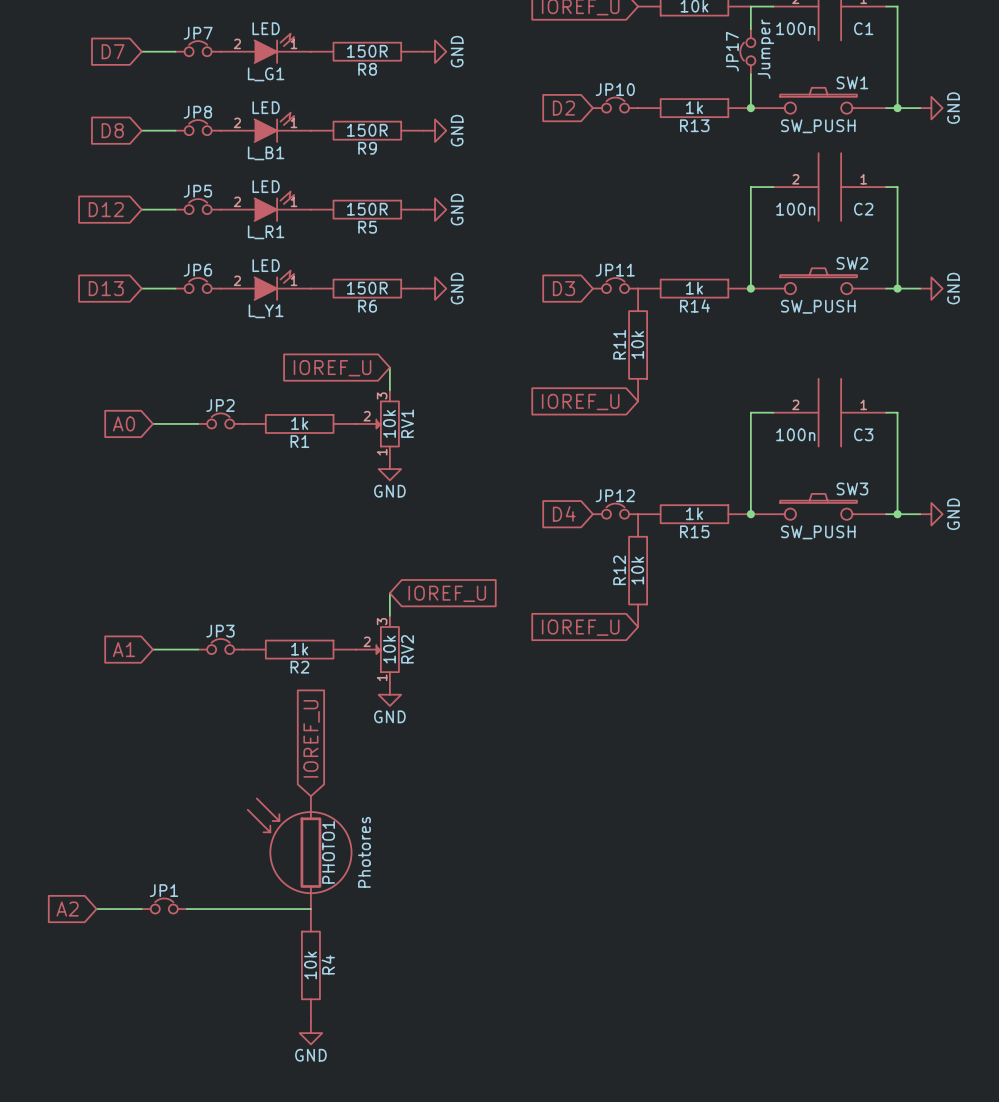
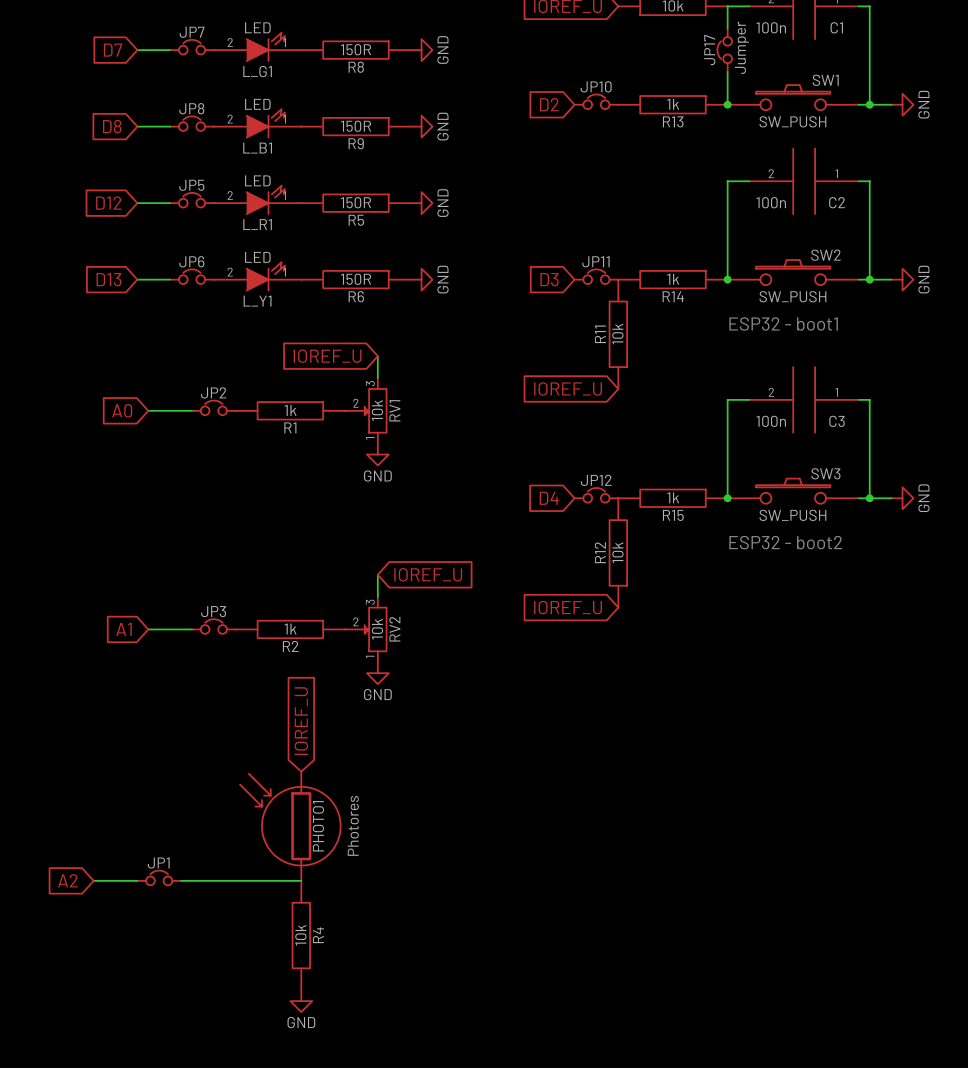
text: none -> ESP32 - boot1 (783, 323)
text: none -> ESP32 - boot2 (785, 542)

